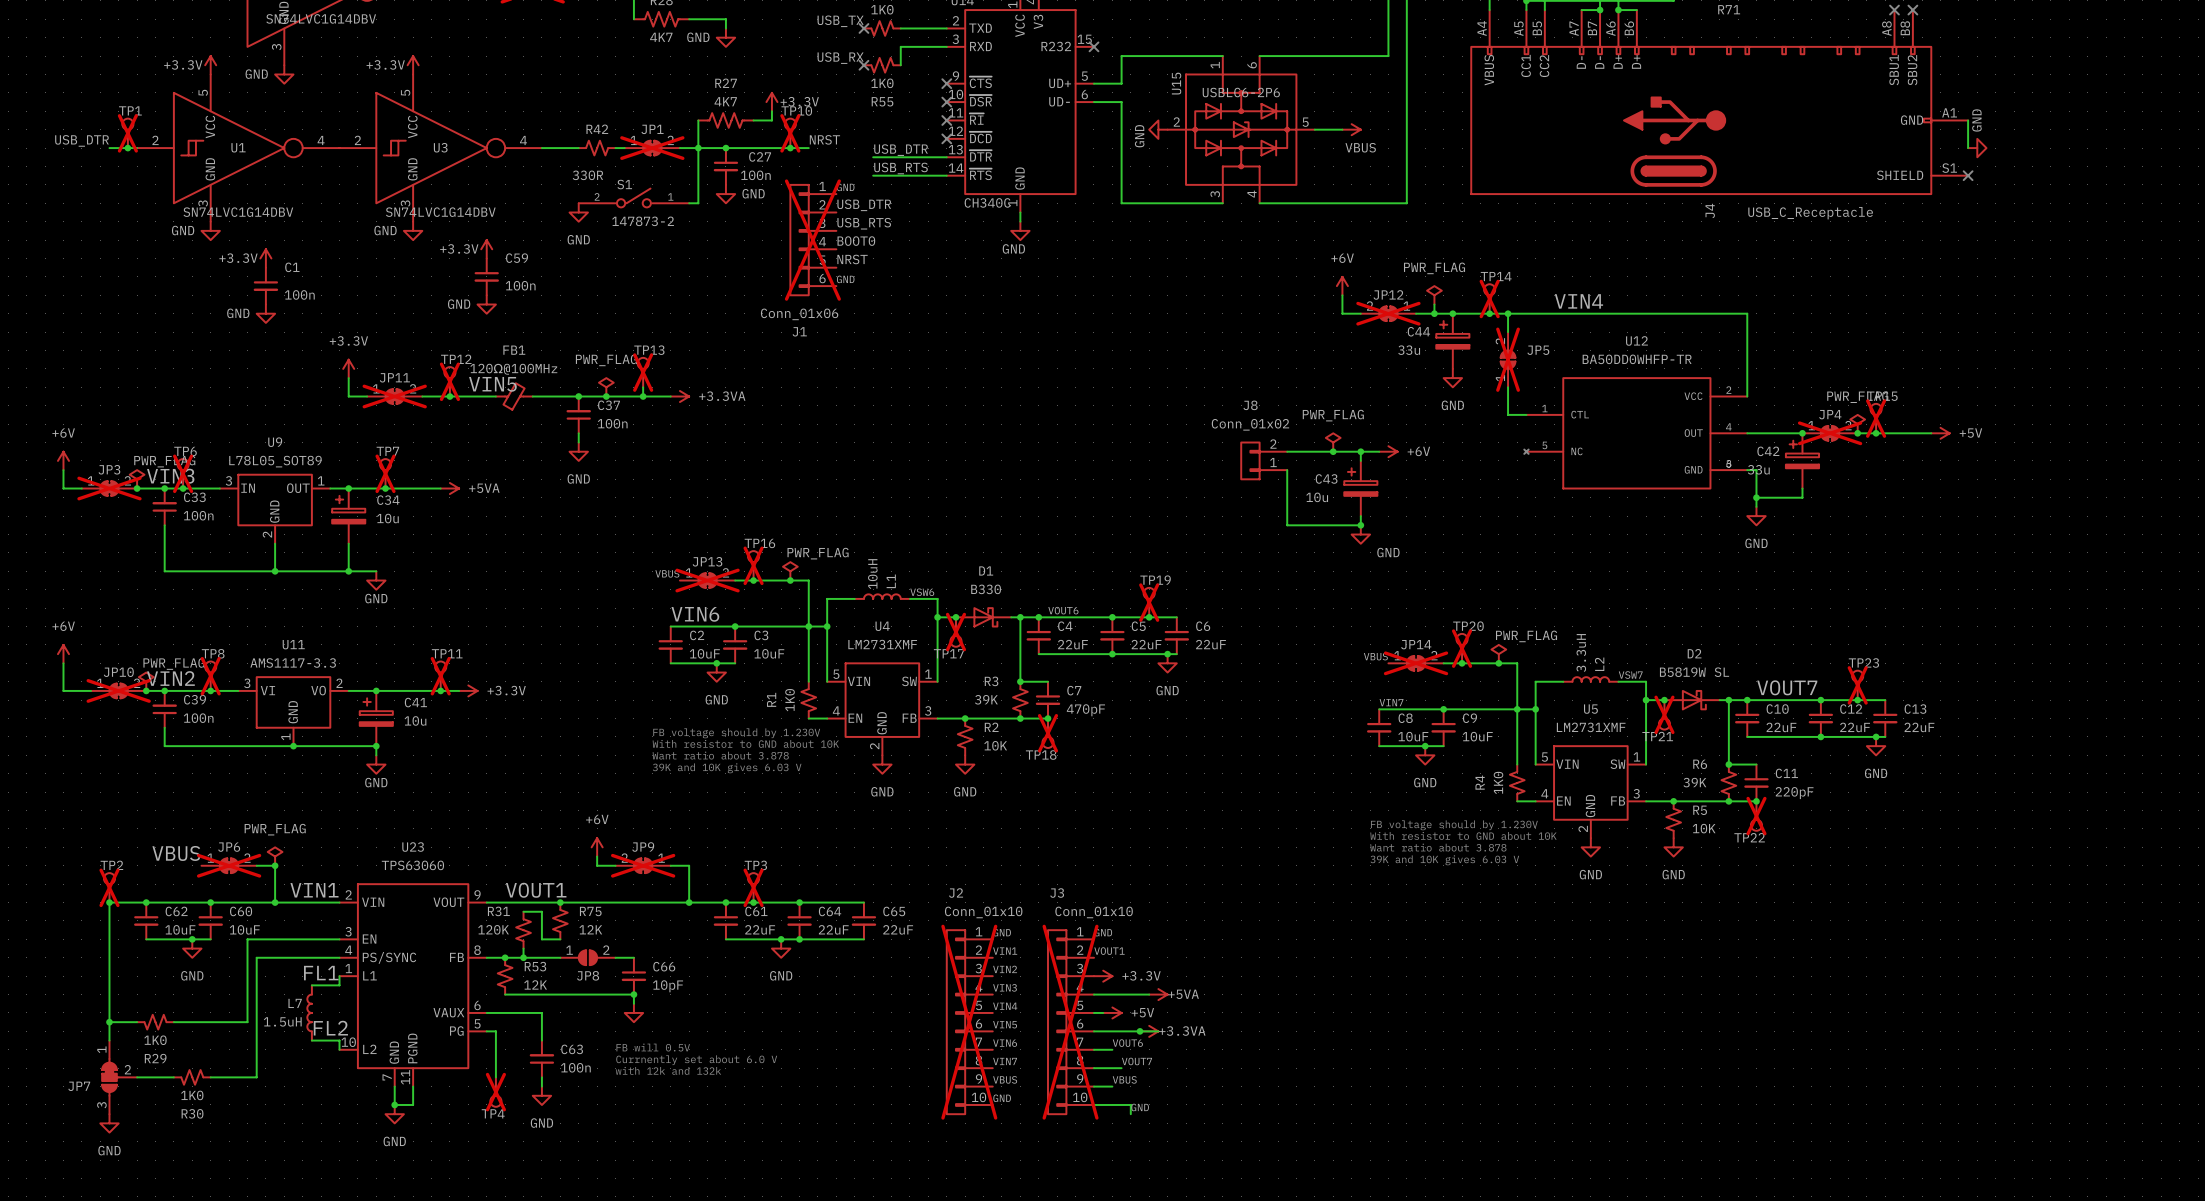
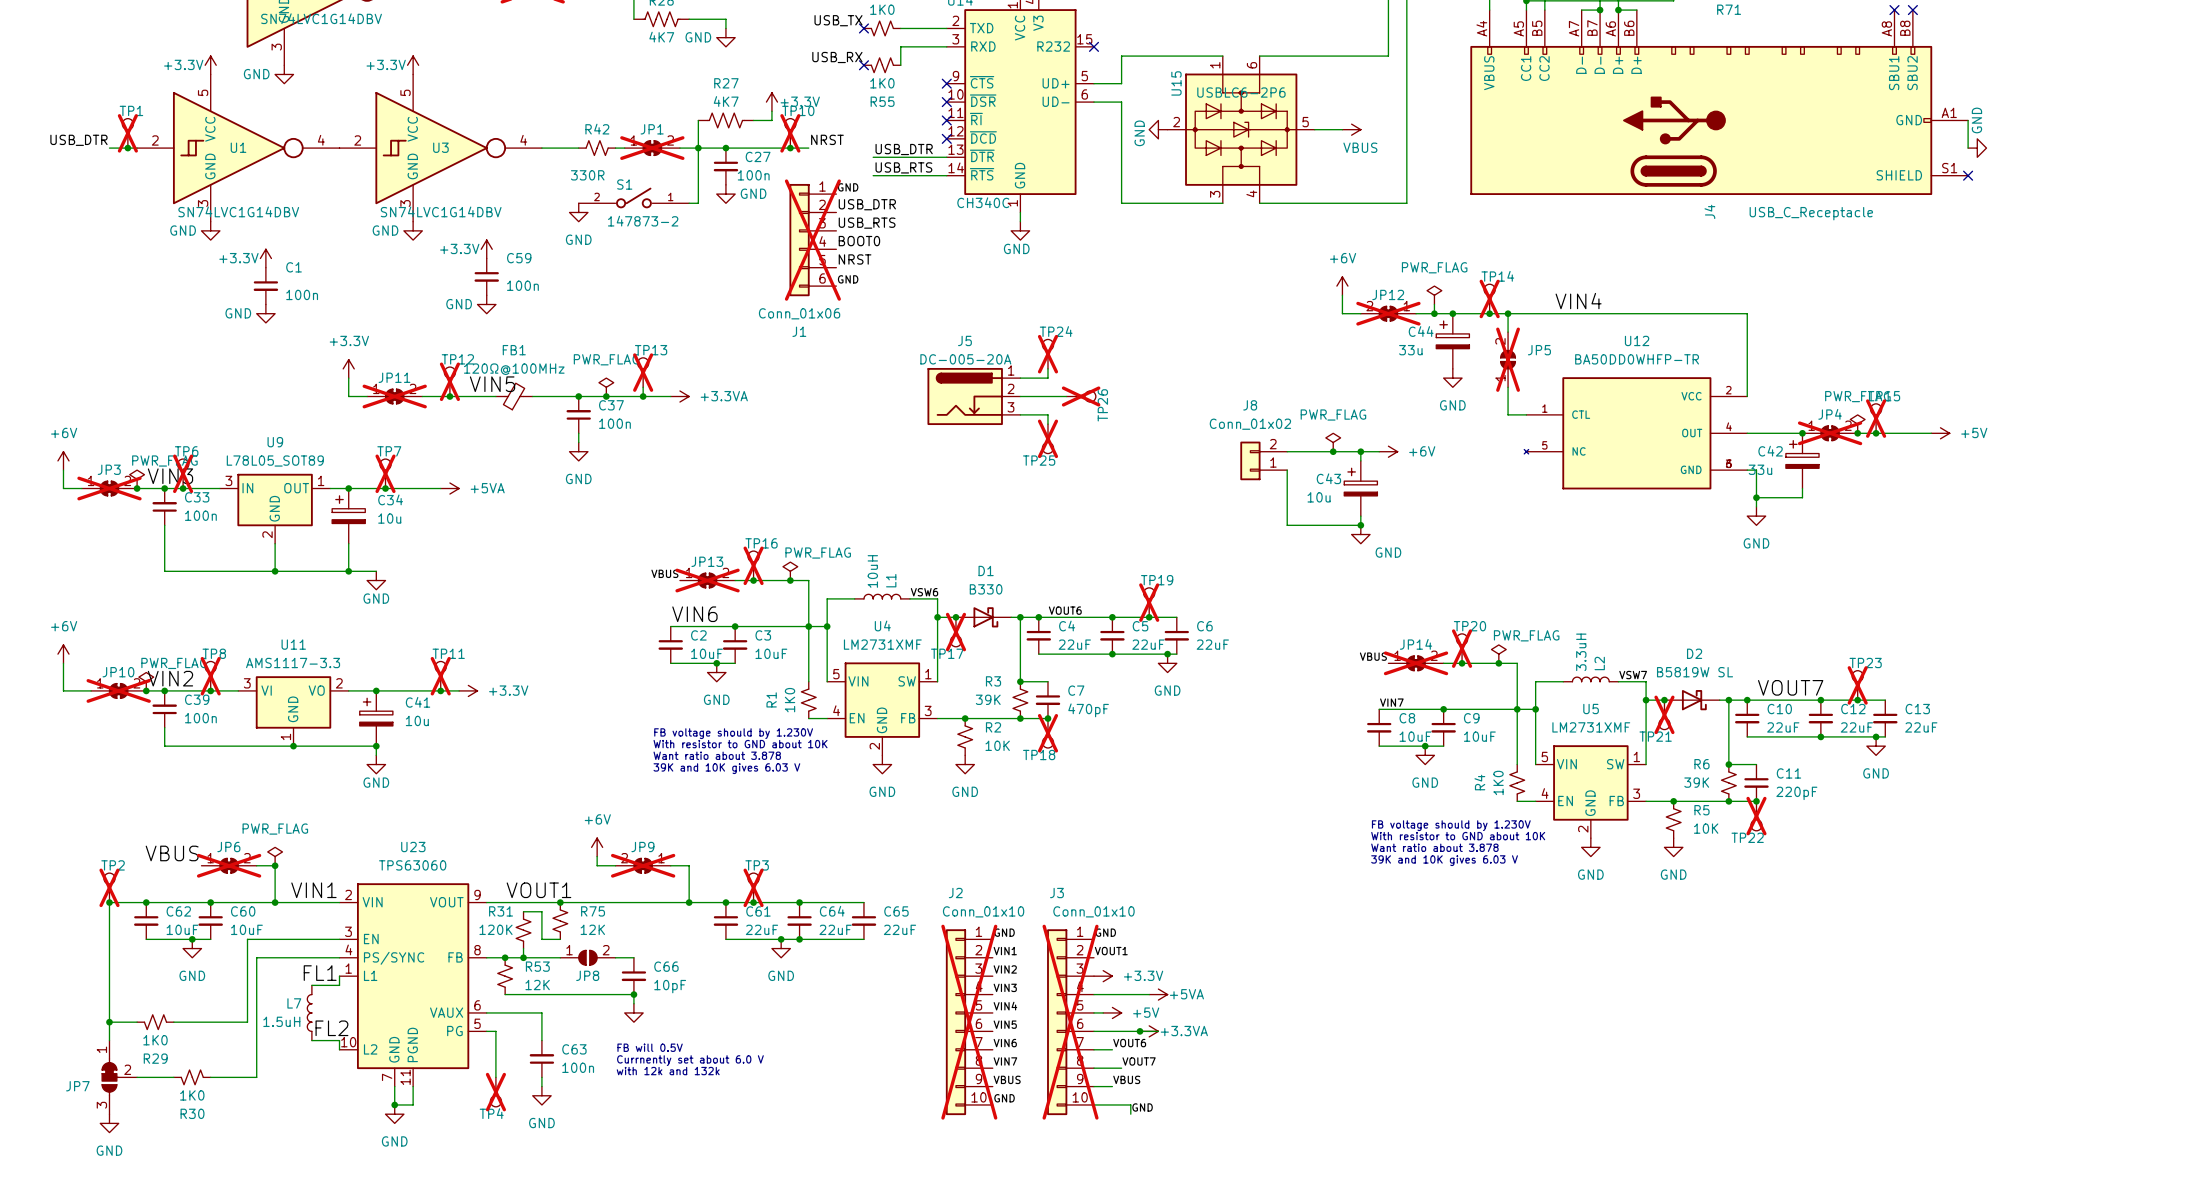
TP24: none -> (1047, 354)
wire: none -> (1047, 368) (1047, 378) (1020, 378)
J5: none -> DC-005-20A (973, 396)
wire: none -> (1020, 396) (1066, 396)
TP26: none -> (1081, 396)
wire: none -> (1020, 414) (1047, 414) (1047, 424)
TP25: none -> (1047, 438)

